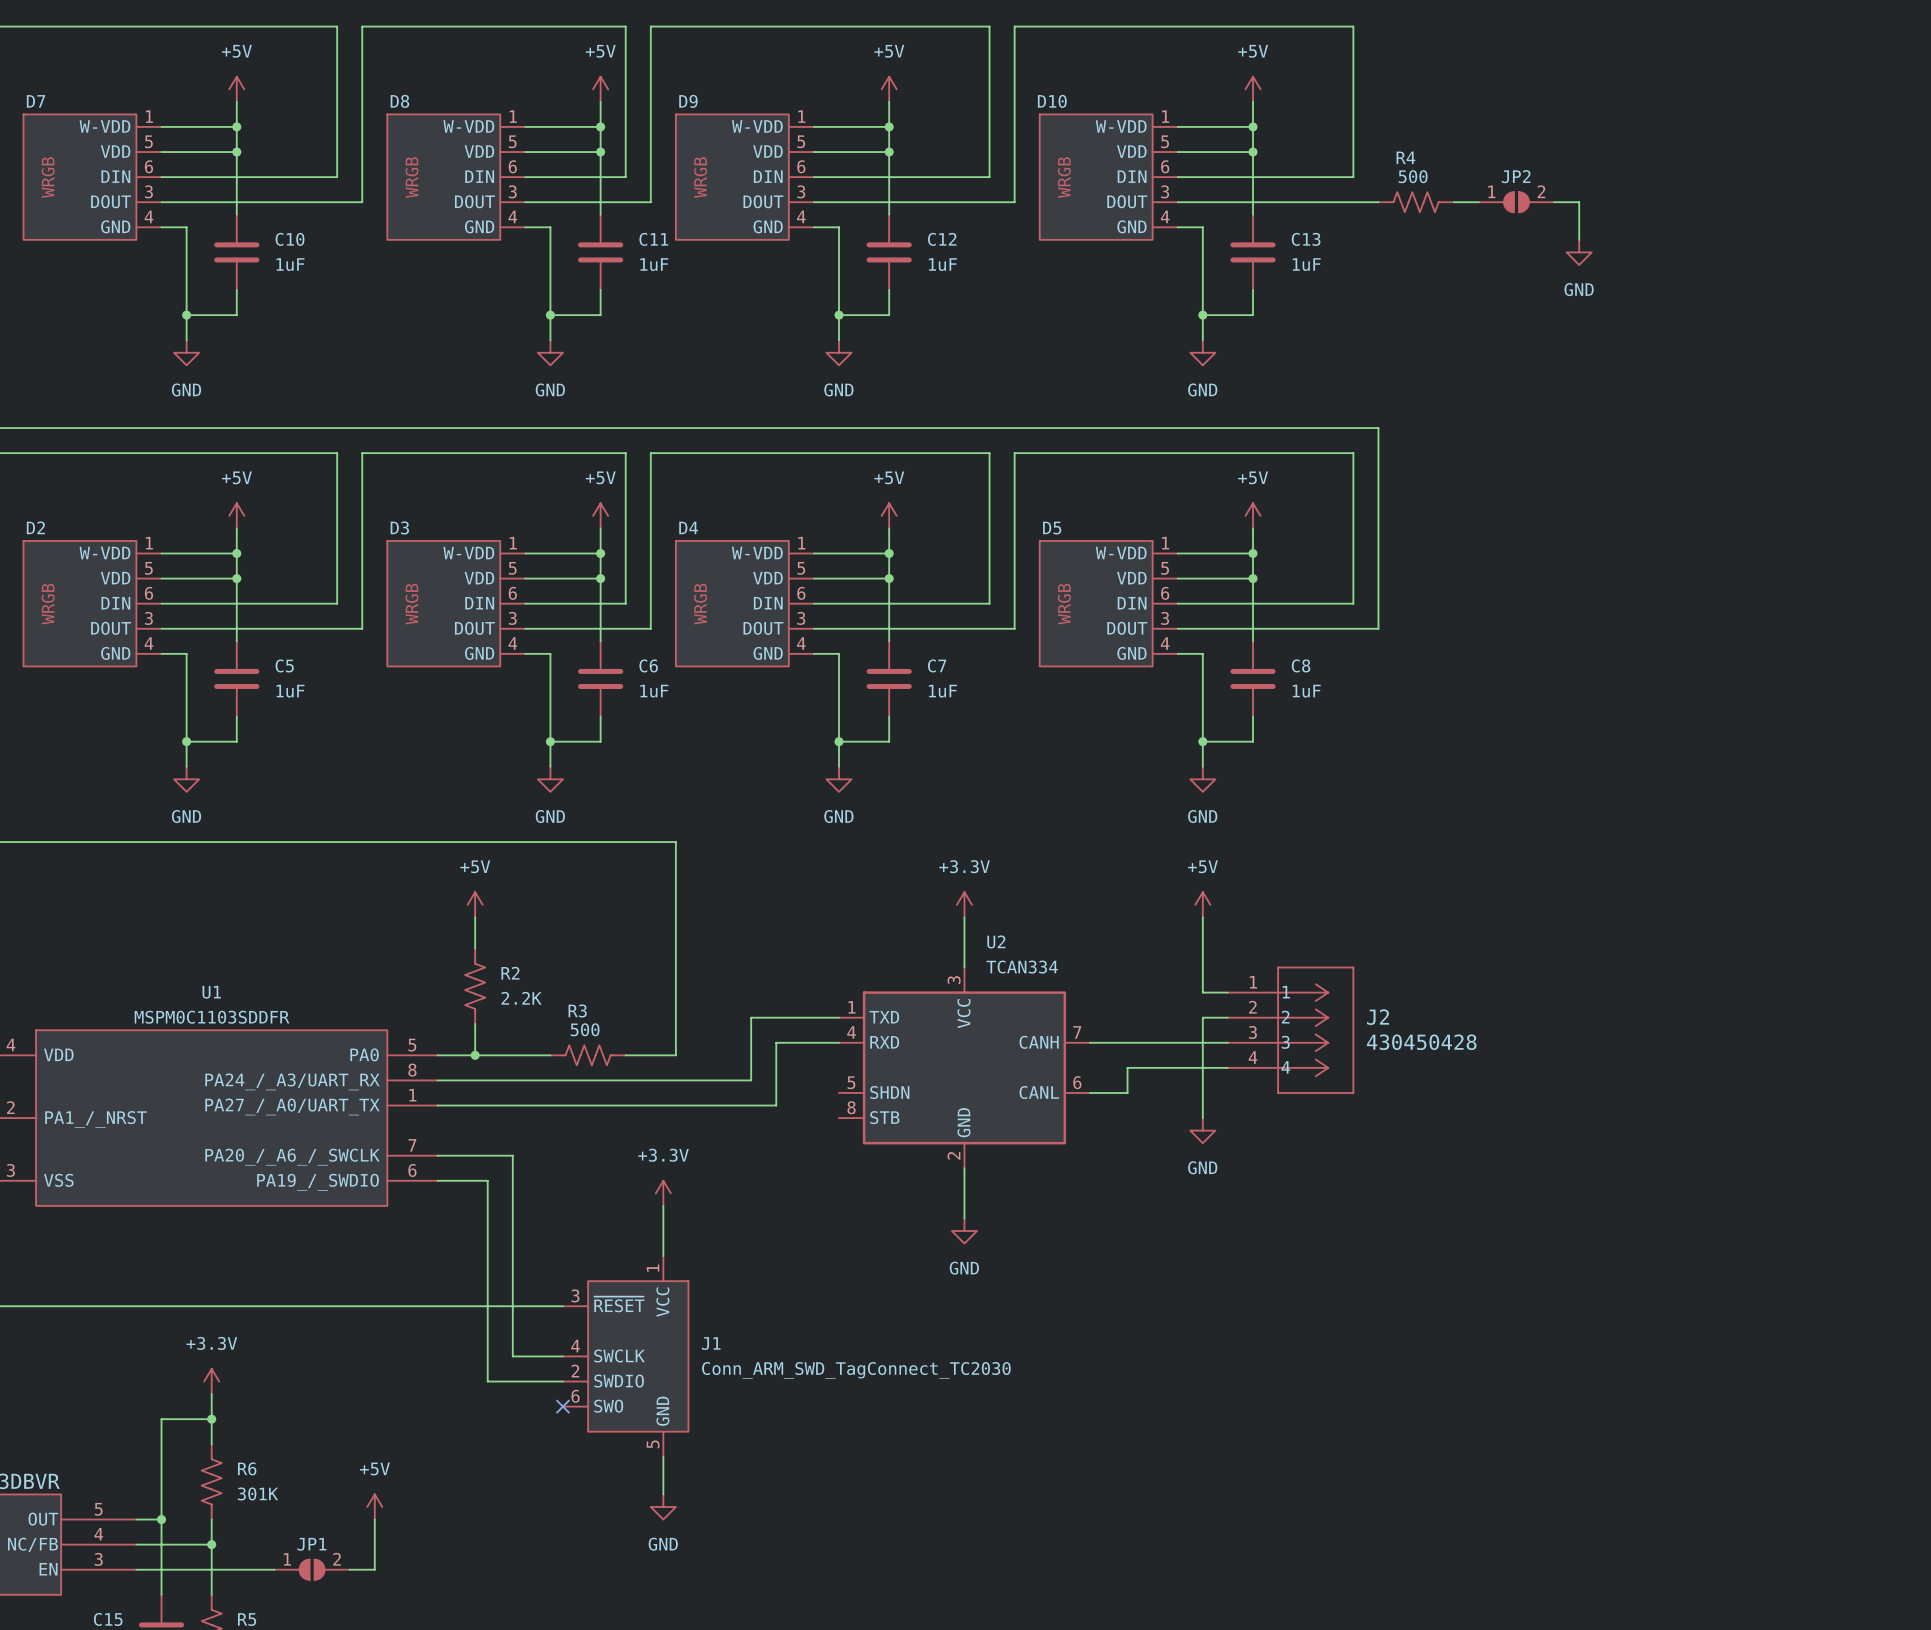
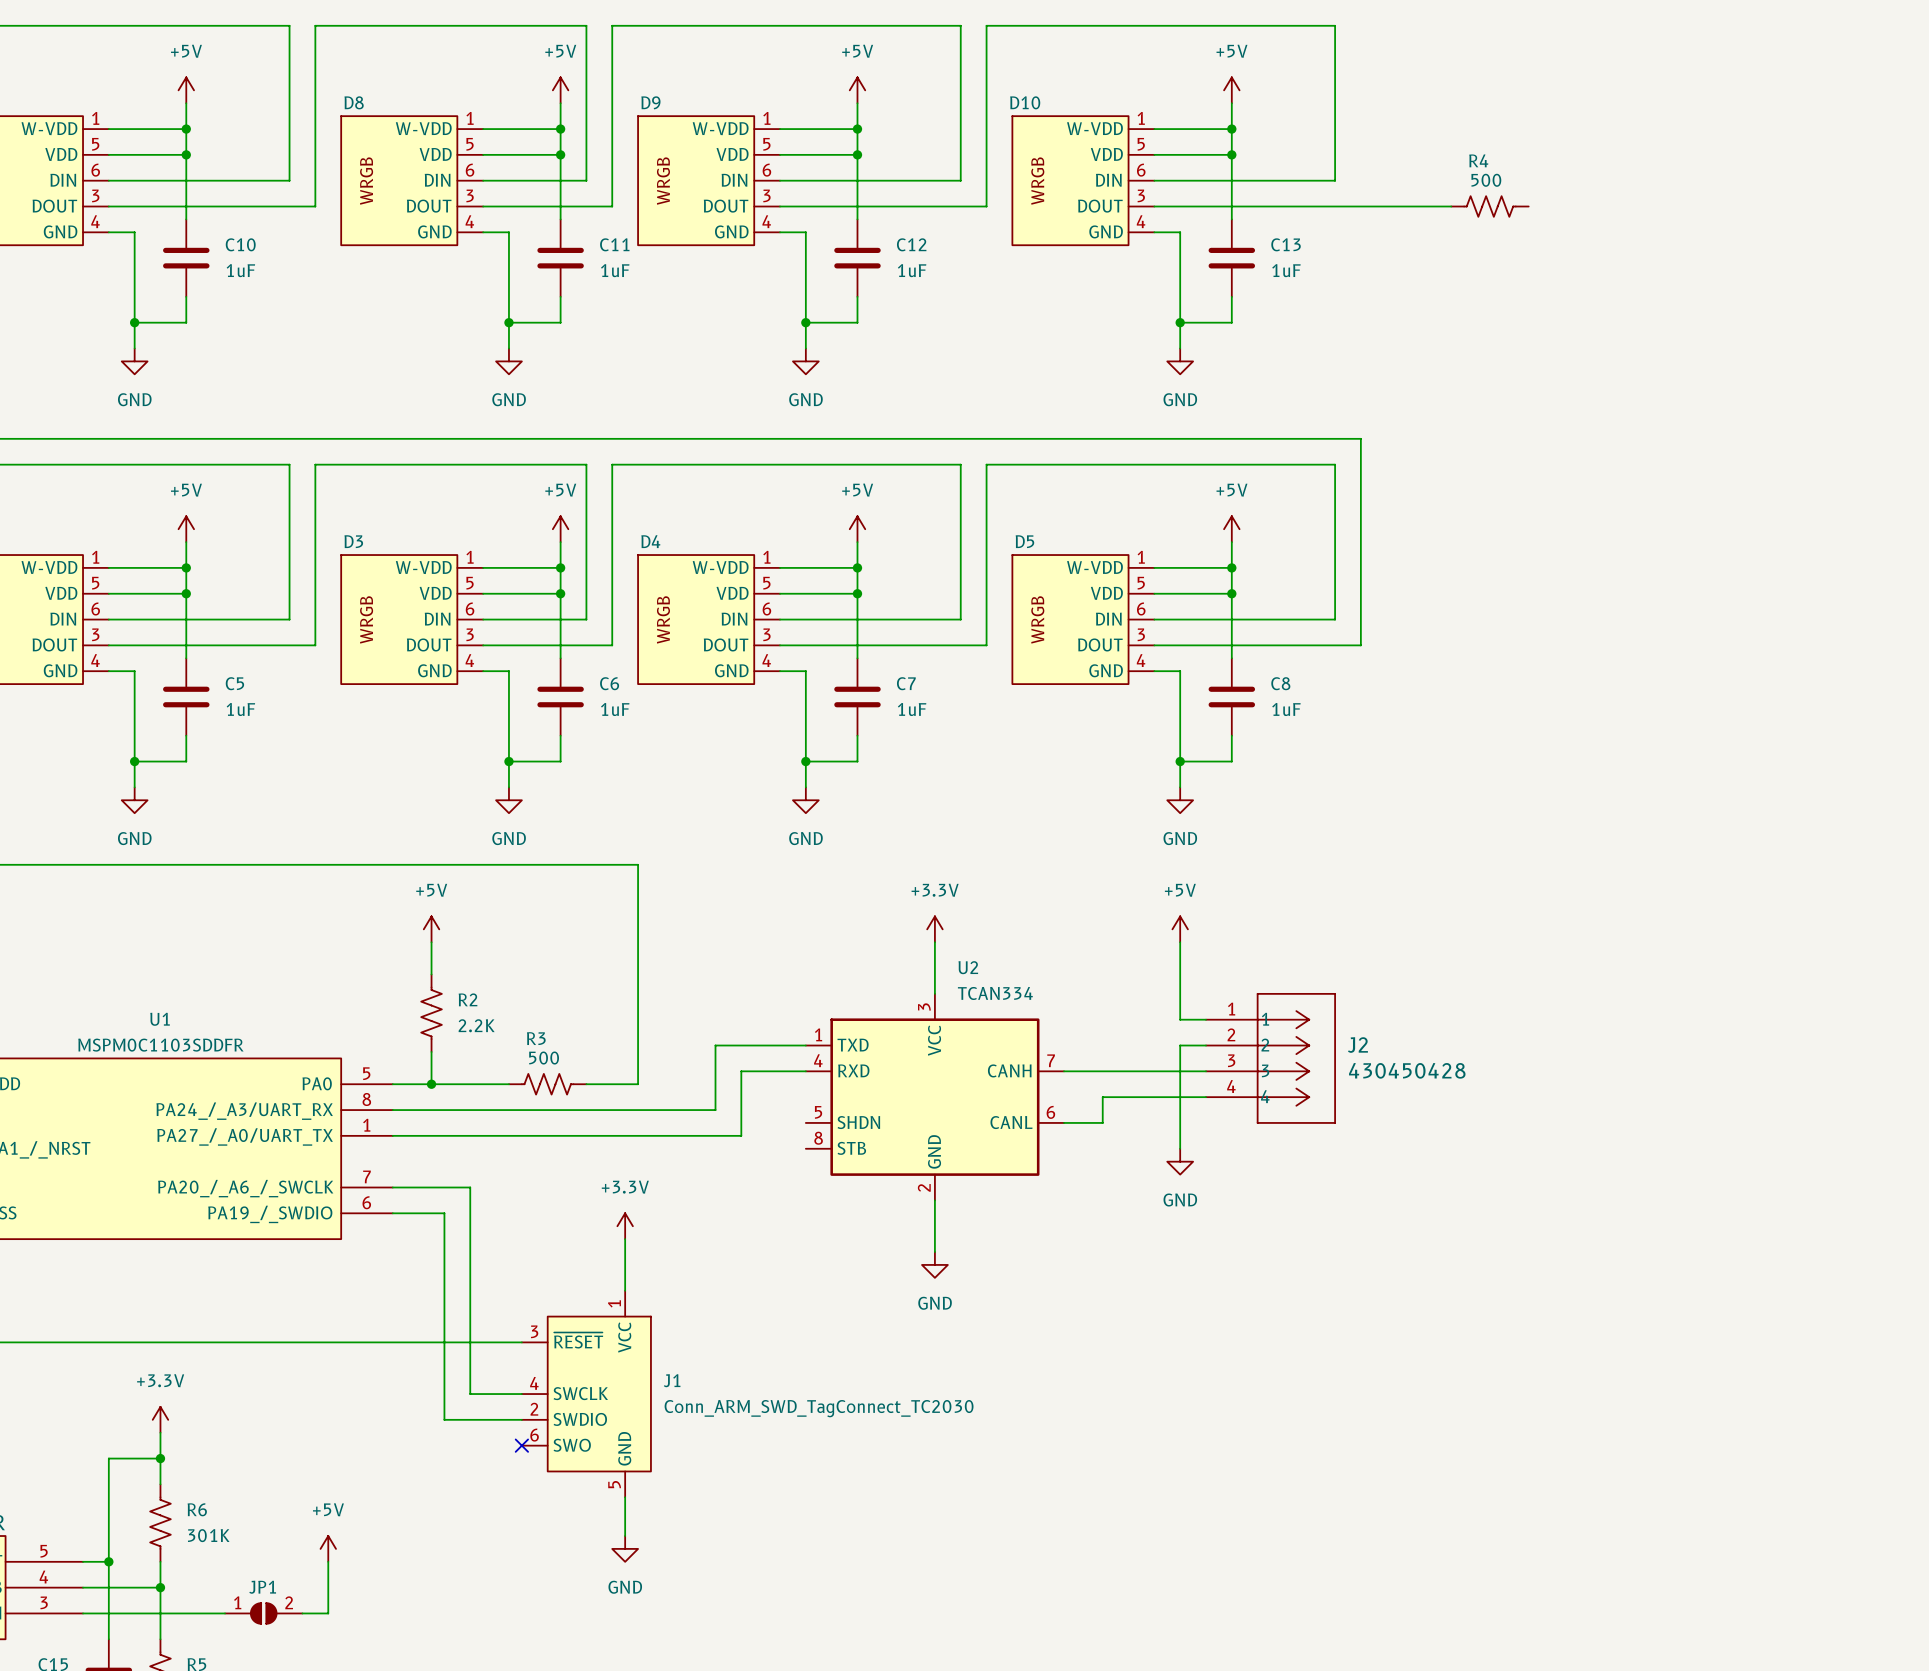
R4 position: (1416, 202) -> (1489, 206)
JP2: (1516, 202) -> none
wire: (1554, 202) (1579, 202) (1579, 239) -> none
power symbol: GND (1579, 252) -> none

